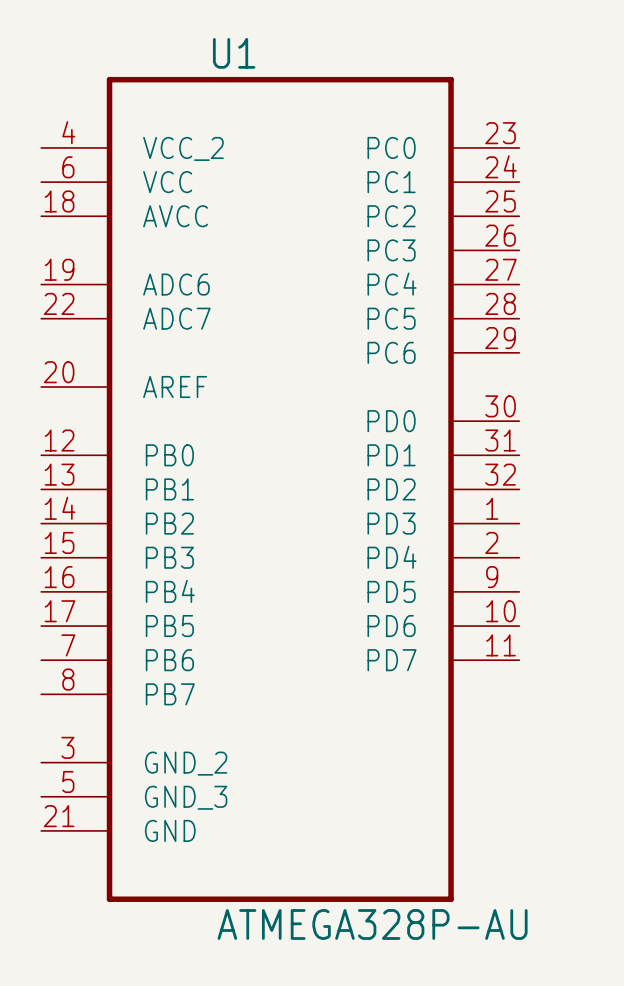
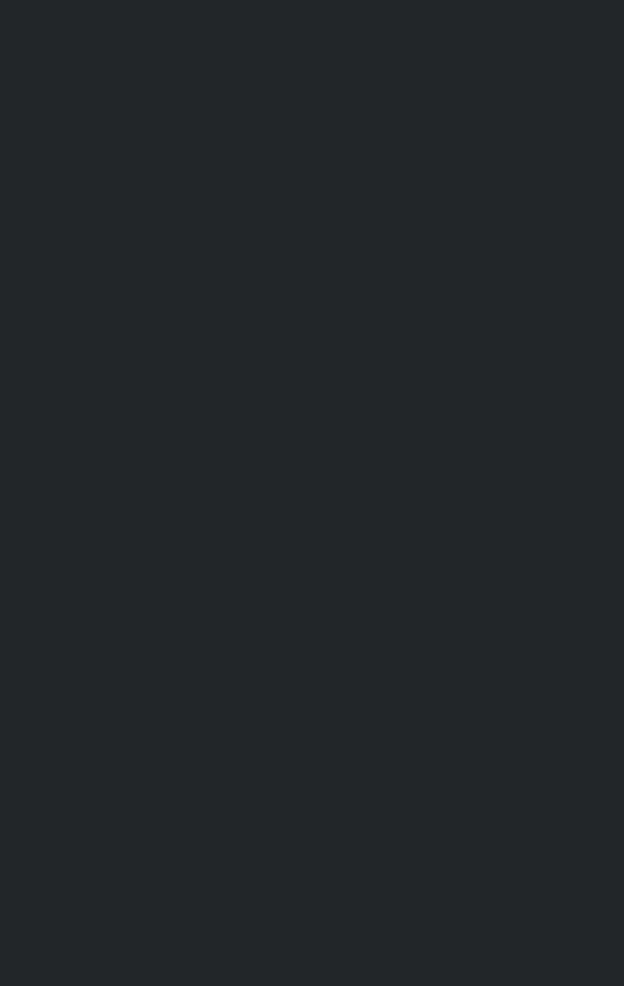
U1: ATMEGA328P-AU (280, 489) -> none

